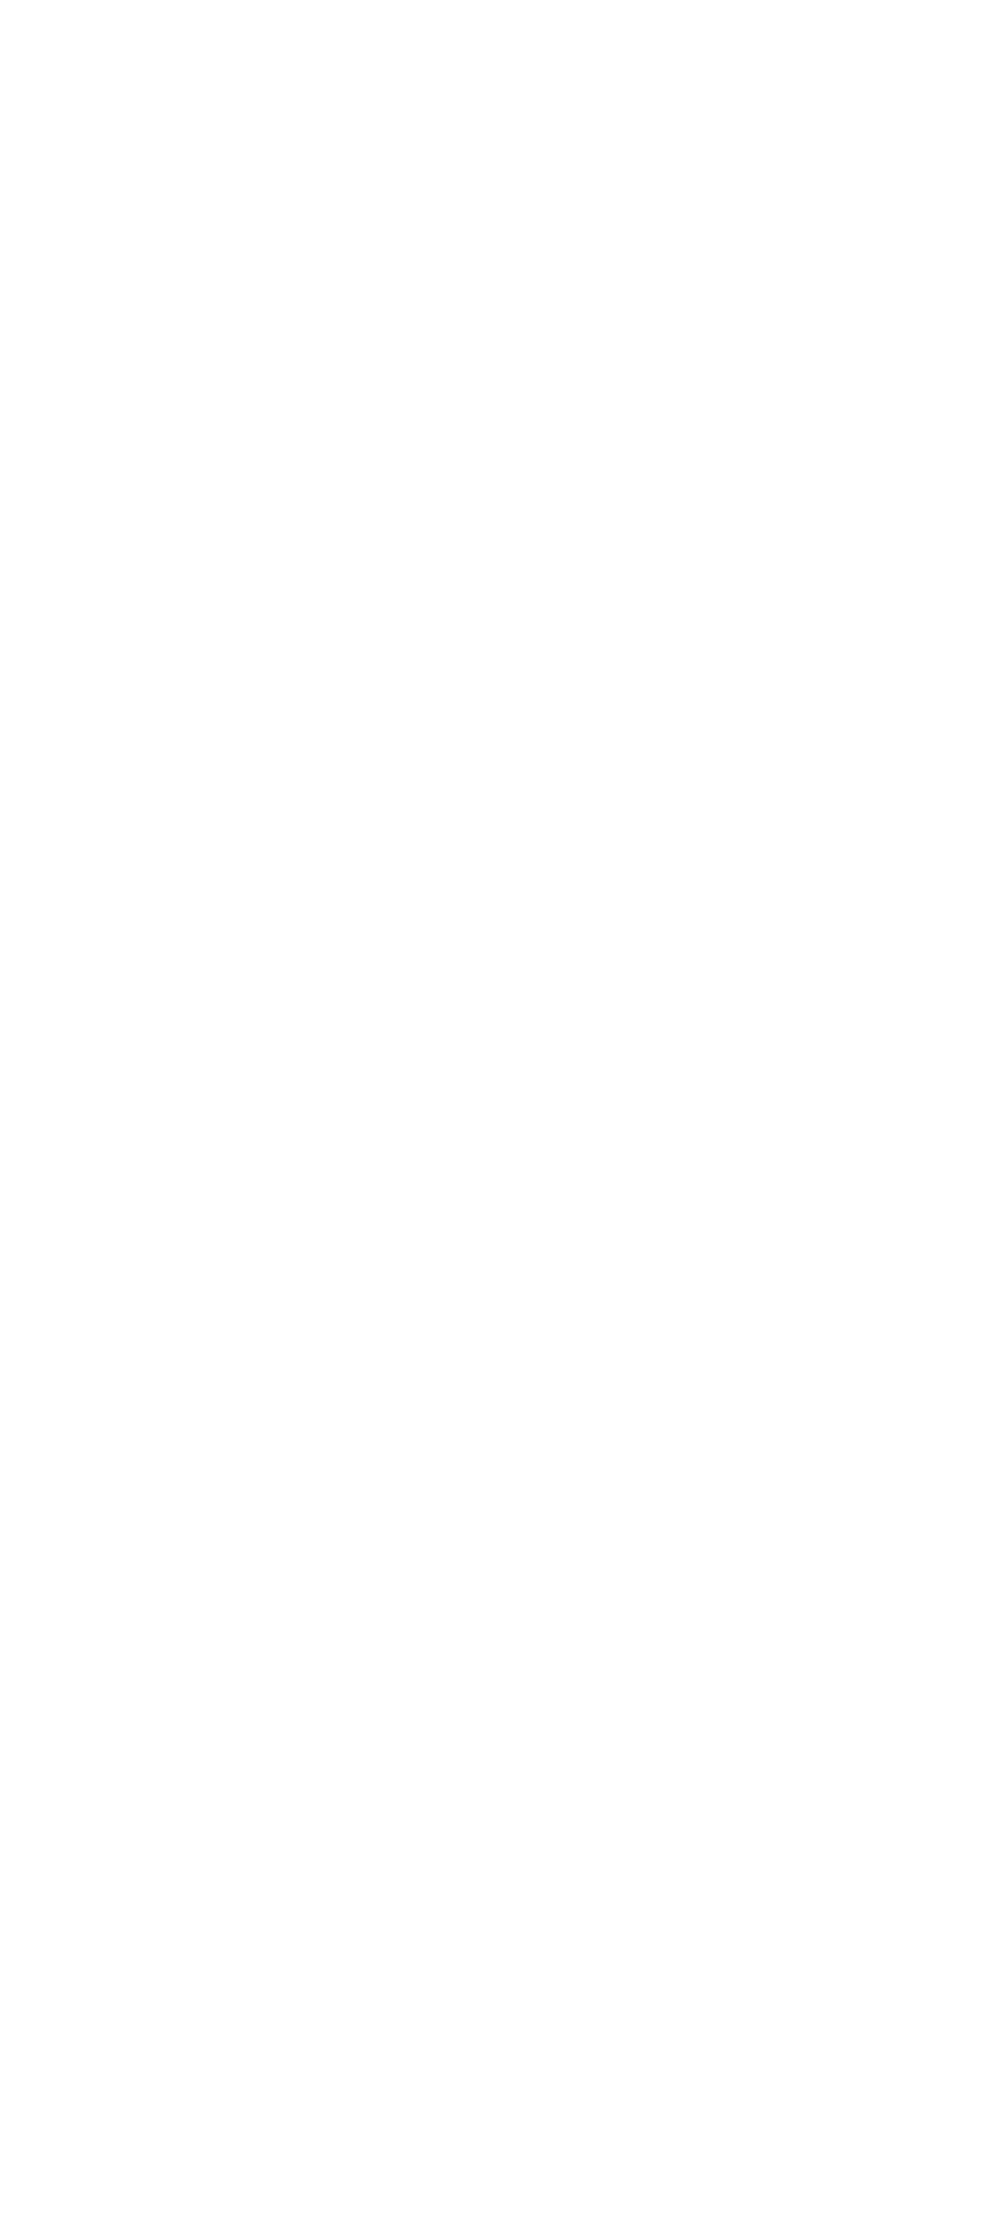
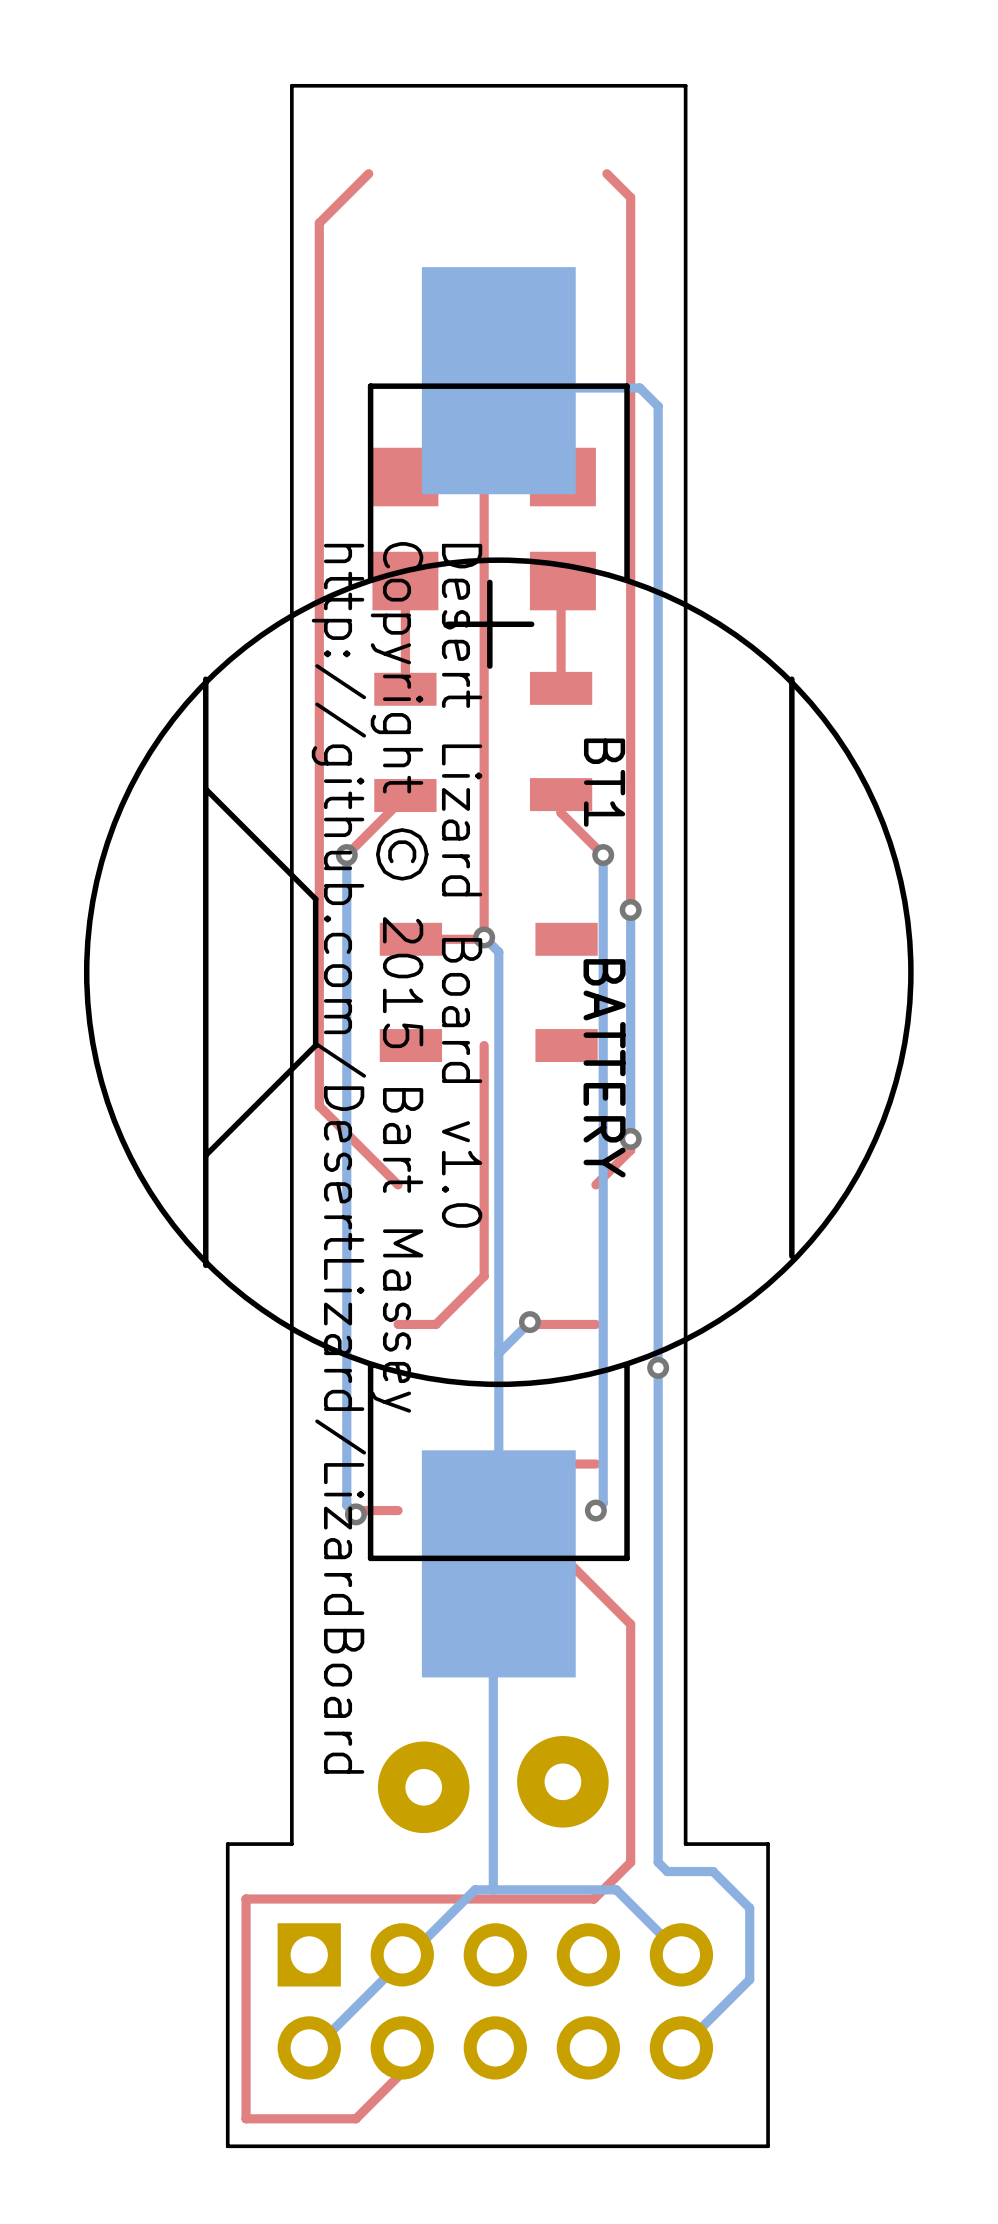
board edge: none -> (685, 85) (291, 85) (291, 1844) (227, 1844) (227, 2146) (768, 2146) (768, 1844) (685, 1844) (685, 85)
top track: none -> (368, 173) (319, 223) (319, 1106) (398, 1184)
top track: none -> (606, 173) (630, 197) (630, 909)
bottom track: none -> (498, 380) (506, 388) (639, 388) (658, 406) (658, 1862) (667, 1871) (713, 1871) (749, 1908) (749, 1979) (681, 2047)
top track: none -> (484, 477) (484, 937) (482, 939) (410, 939)
part: none -> (405, 529)
part: none -> (562, 529)
top track: none -> (405, 581) (405, 689)
top track: none -> (562, 581) (561, 582) (561, 688)
part: none -> (561, 741)
part: none -> (405, 742)
top track: none -> (561, 794) (561, 812) (603, 855)
top track: none -> (405, 795) (346, 855)
bottom track: none -> (346, 855) (346, 1505) (355, 1514)
via: none -> (346, 855)
bottom track: none -> (603, 855) (603, 1503) (595, 1510)
via: none -> (603, 855)
text: none -> Desert Lizard Board v1.0 (462, 885)
bottom track: none -> (630, 909) (630, 1138)
via: none -> (630, 909)
bottom track: none -> (484, 937) (498, 952) (498, 1563) (493, 1569) (493, 1889)
via: none -> (484, 937)
BT1: none -> BATTERY (498, 972)
text: none -> Copyright © 2015 Bart Massey (399, 977)
part: none -> (410, 992)
part: none -> (566, 992)
top track: none -> (484, 1045) (484, 1276) (435, 1324) (398, 1324)
top track: none -> (630, 1138) (630, 1150) (595, 1184)
via: none -> (630, 1138)
text: none -> http://github.com/DesertLizard/LizardBoard (338, 1158)
bottom track: none -> (529, 1322) (498, 1353)
top track: none -> (529, 1322) (532, 1324) (595, 1324)
via: none -> (529, 1322)
via: none -> (658, 1367)
top track: none -> (595, 1464) (552, 1464) (548, 1468) (548, 1541) (630, 1624) (630, 1862) (594, 1899) (246, 1899) (246, 2118) (355, 2118) (402, 2072) (402, 2047)
top track: none -> (398, 1510) (359, 1510) (355, 1514)
via: none -> (595, 1510)
via: none -> (355, 1514)
part: none -> (562, 1781)
part: none -> (423, 1787)
bottom track: none -> (681, 1954) (616, 1889) (475, 1889) (409, 1954) (402, 1954) (402, 1960) (309, 2053) (309, 2047)
part: none -> (495, 2001)

